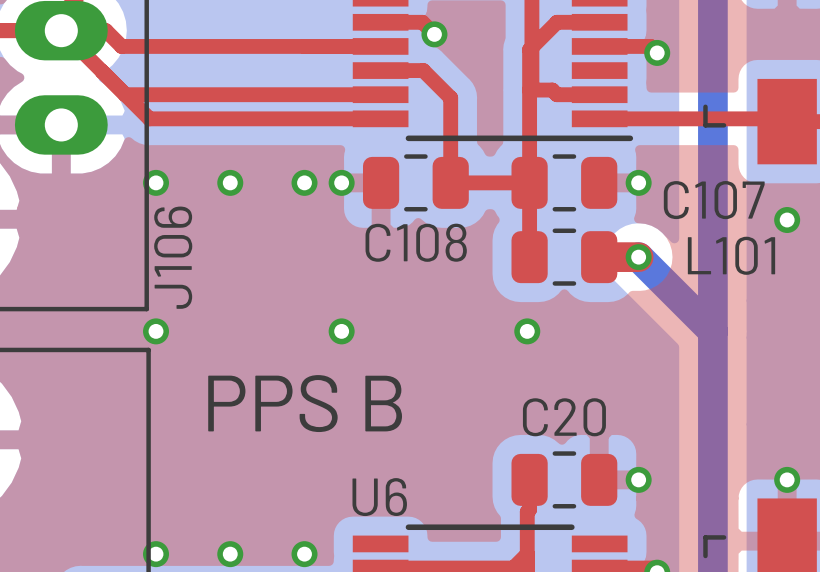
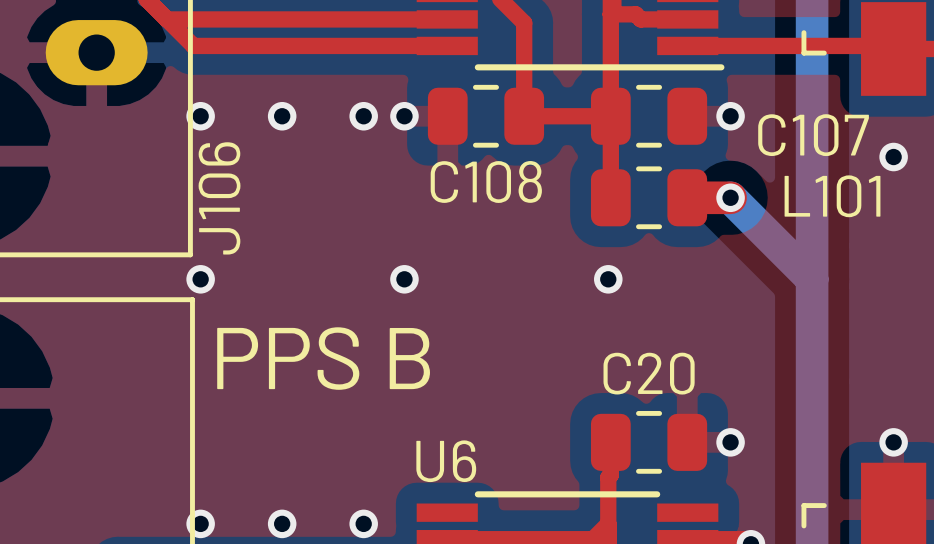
text position: PPS B (305, 403) -> PPS B (323, 358)

